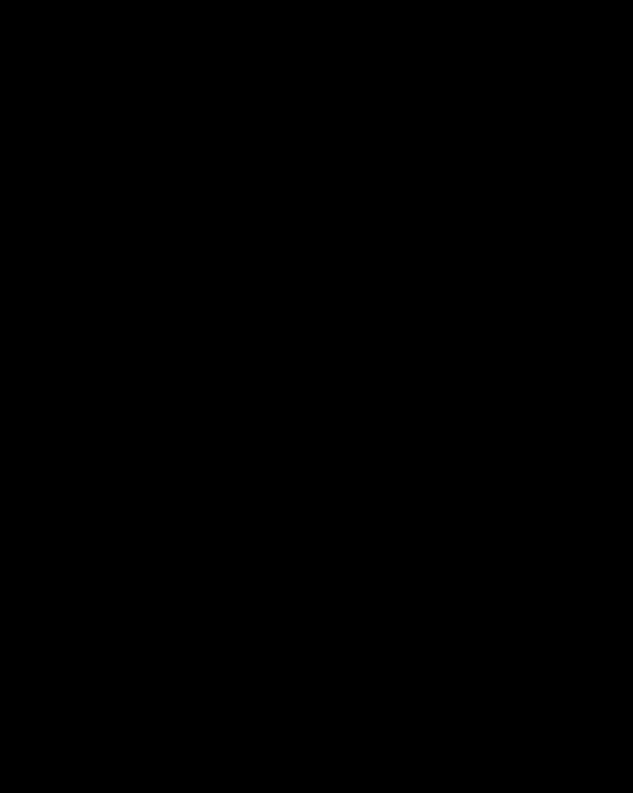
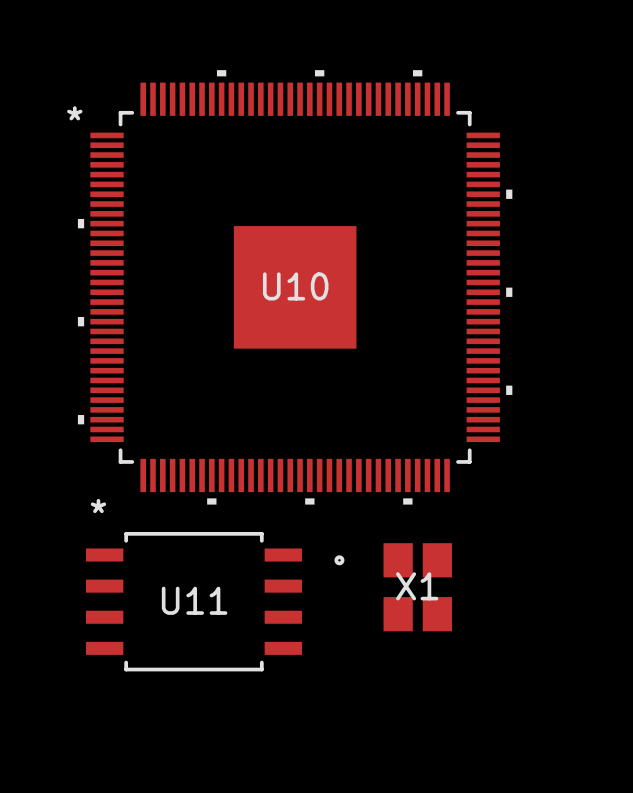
U10: none -> (295, 287)
X1: none -> (393, 587)
U11: none -> (193, 601)

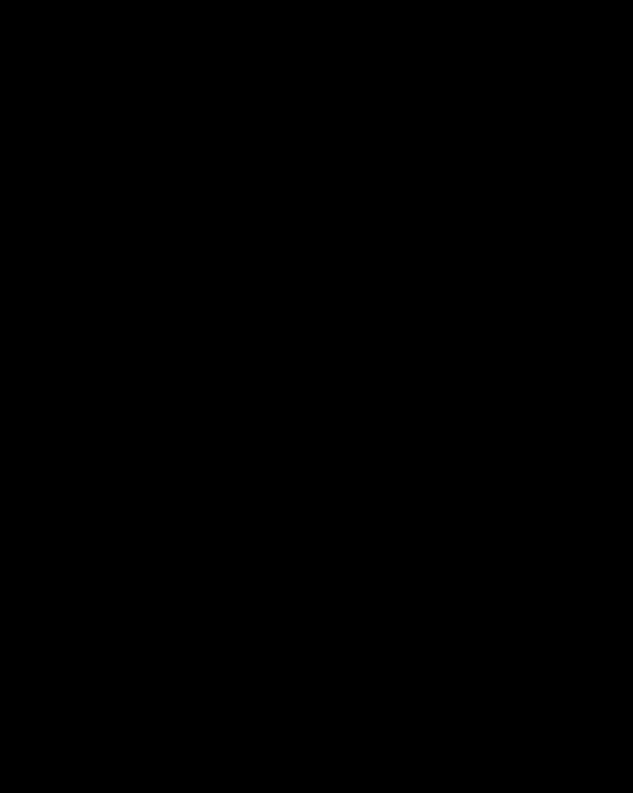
U10: (295, 287) -> none
X1: (393, 587) -> none
U11: (193, 601) -> none

